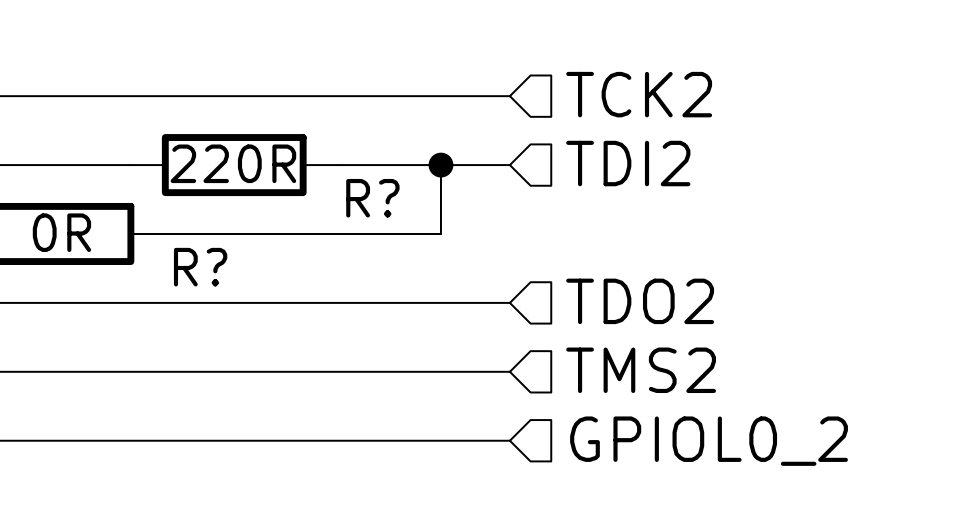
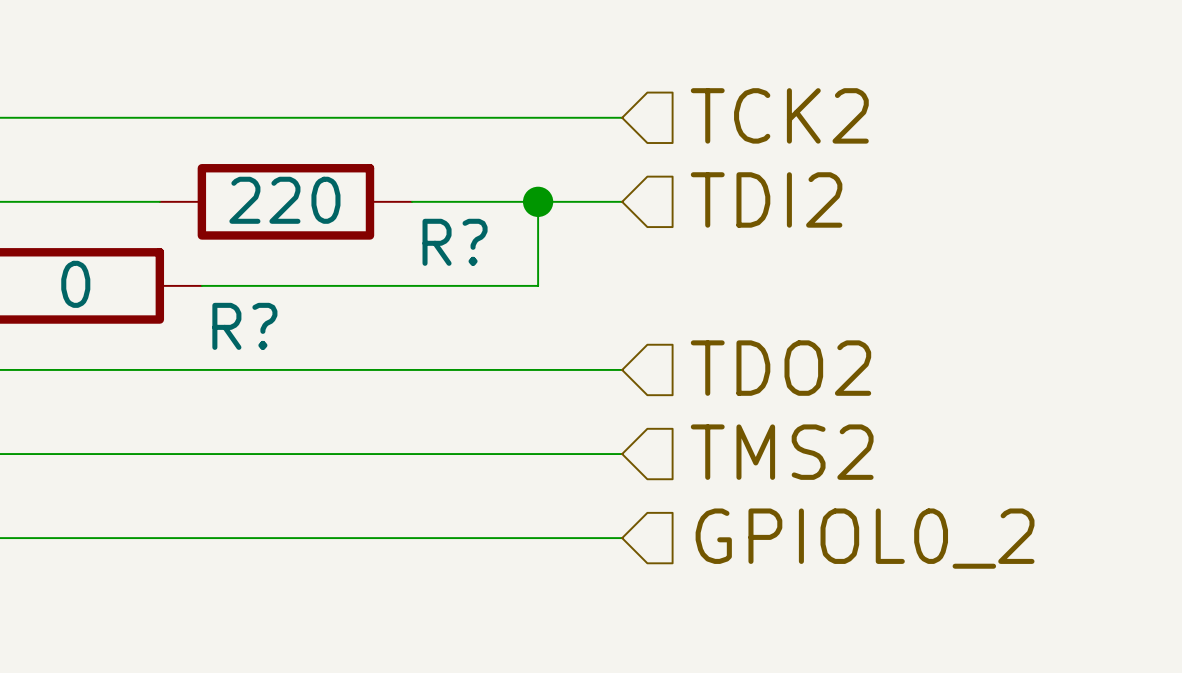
R? value: 220R (233, 163) -> 220 (284, 200)
R? value: 0R (61, 232) -> 0 (75, 284)

